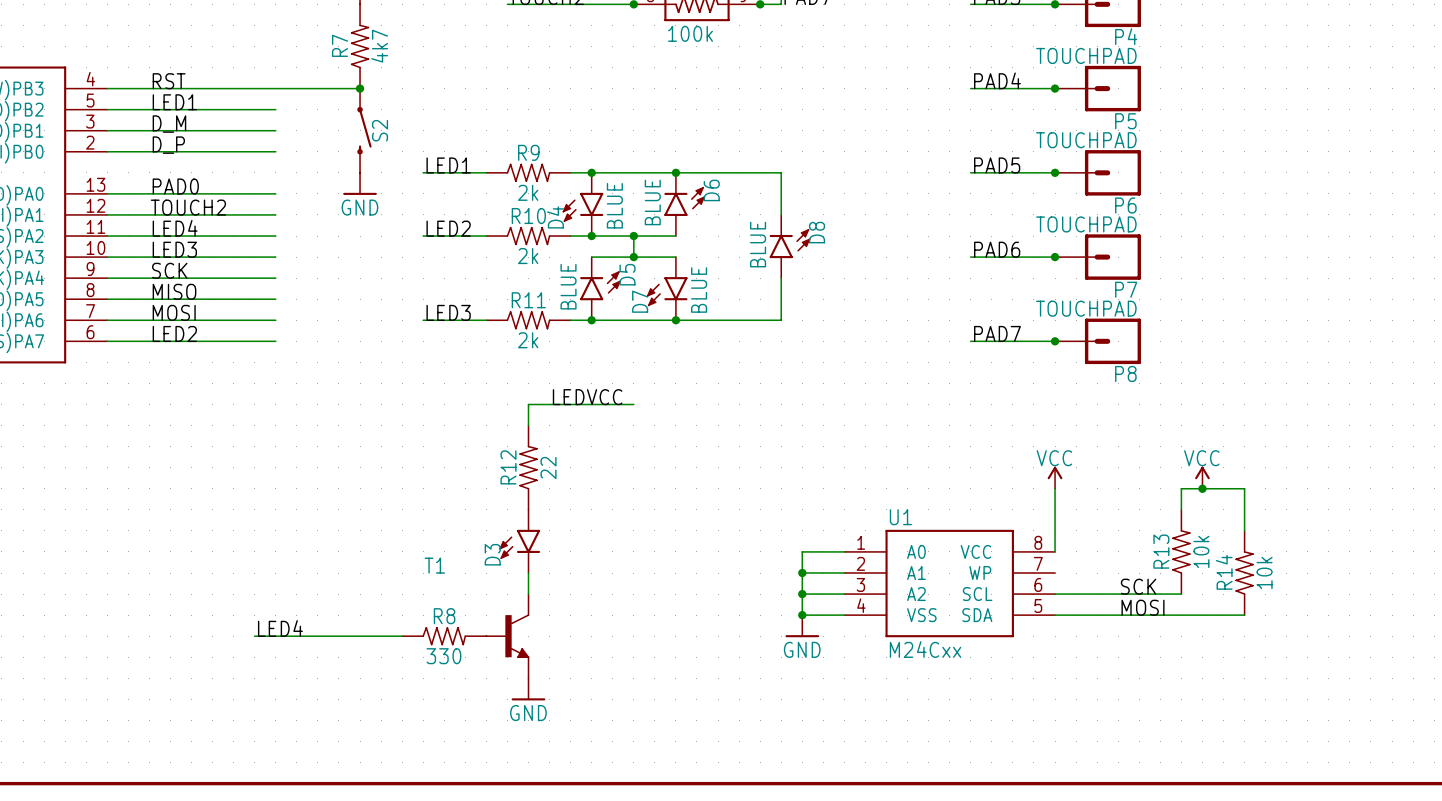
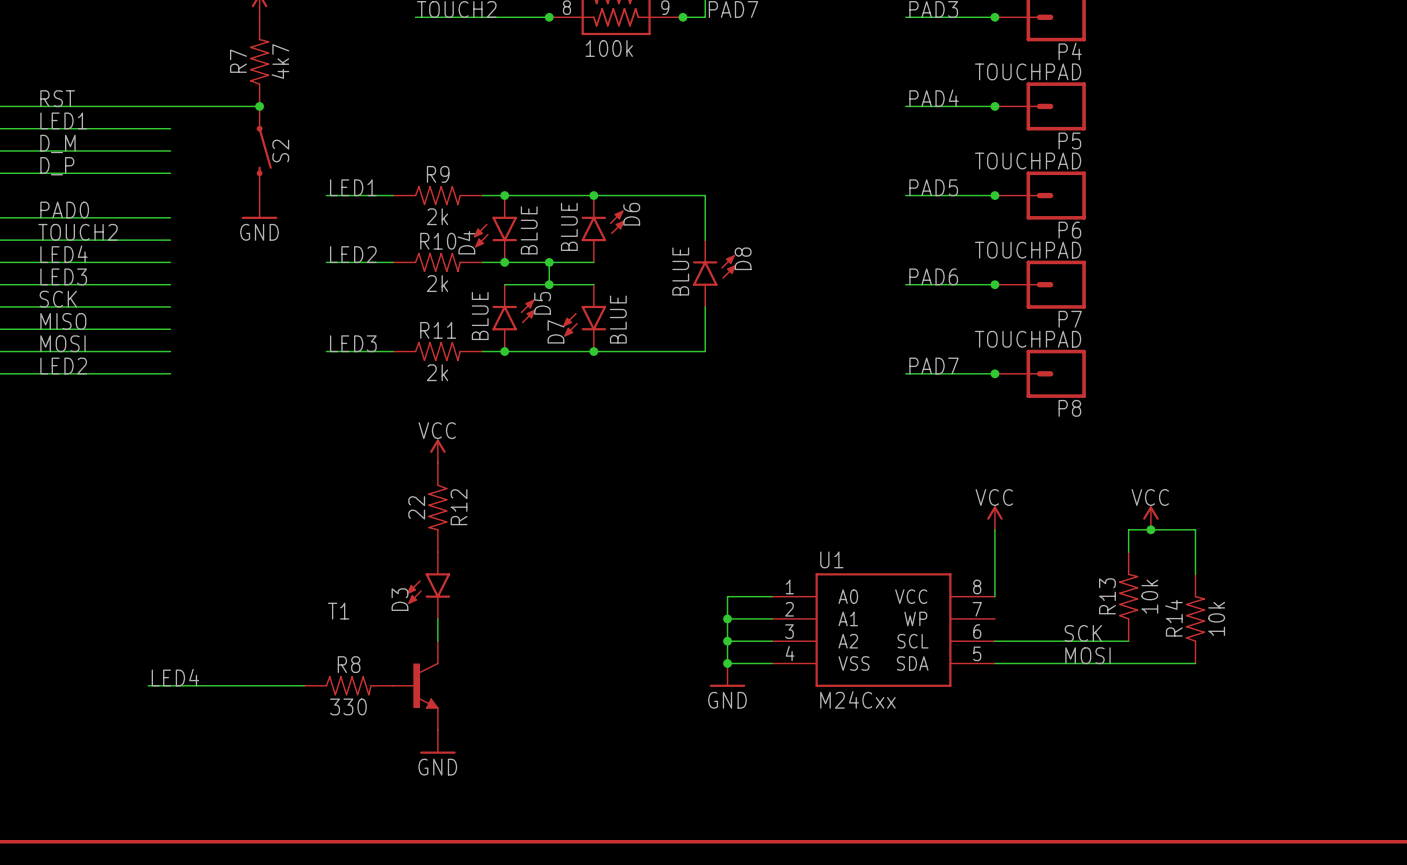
label: LEDVCC (587, 397) -> none
wire: (633, 404) (528, 404) (528, 425) -> none
power symbol: none -> VCC (437, 451)
R12 rotation: 0° (528, 467) -> 180° (437, 507)

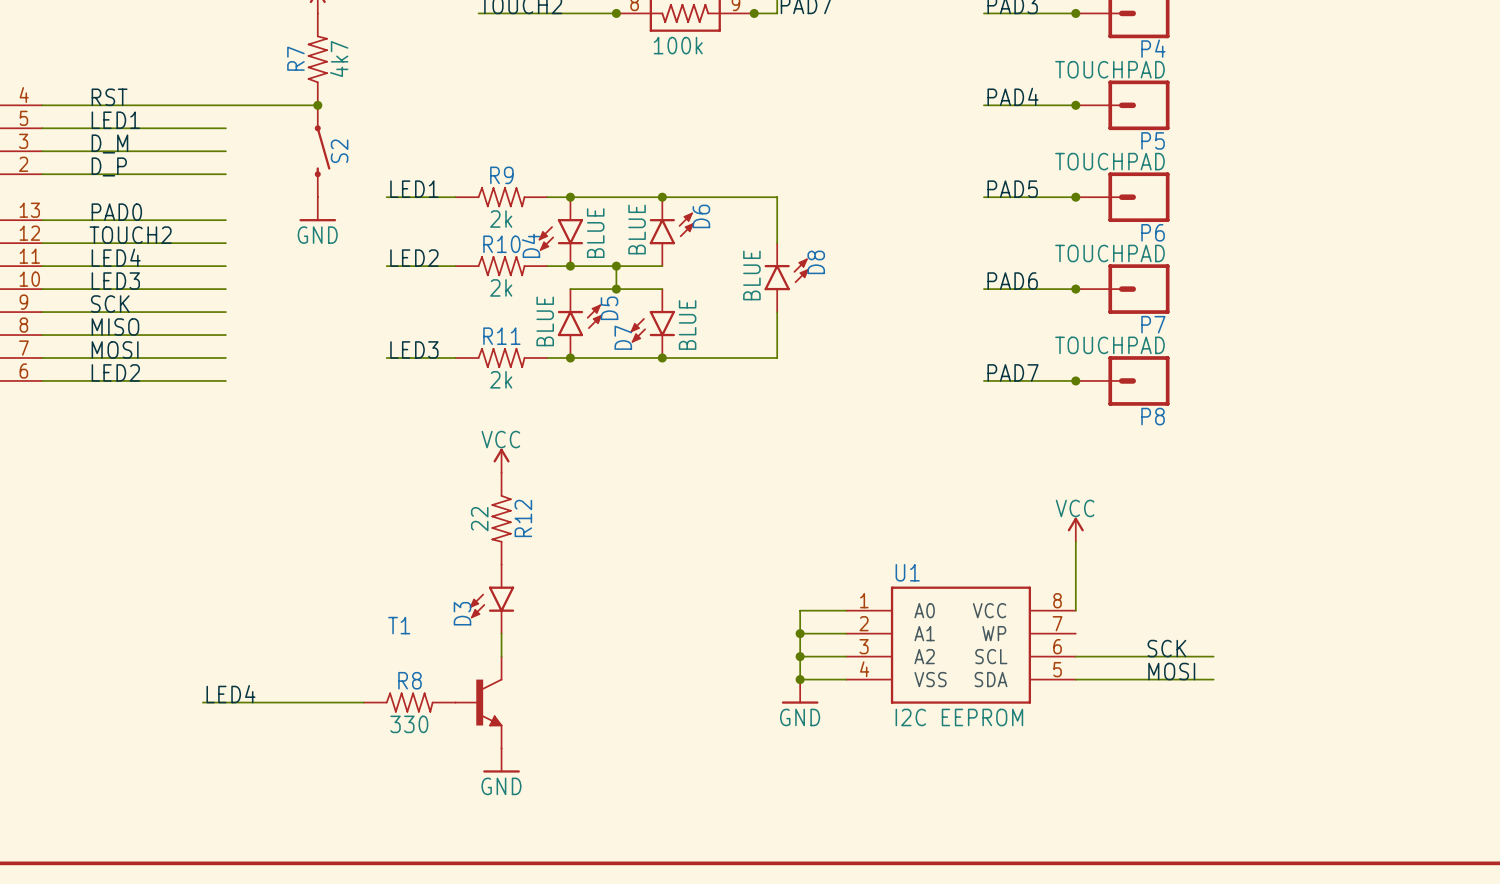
power symbol: VCC (1150, 518) -> none
junction: (1150, 529) -> none
wire: (1128, 552) (1128, 529) (1195, 529) (1195, 574) -> none
R13: 10k (1128, 596) -> none
R14: 10k (1195, 618) -> none
wire: (1128, 663) (1195, 663) -> none
U1 value: M24Cxx (857, 699) -> I2C EEPROM (959, 717)

